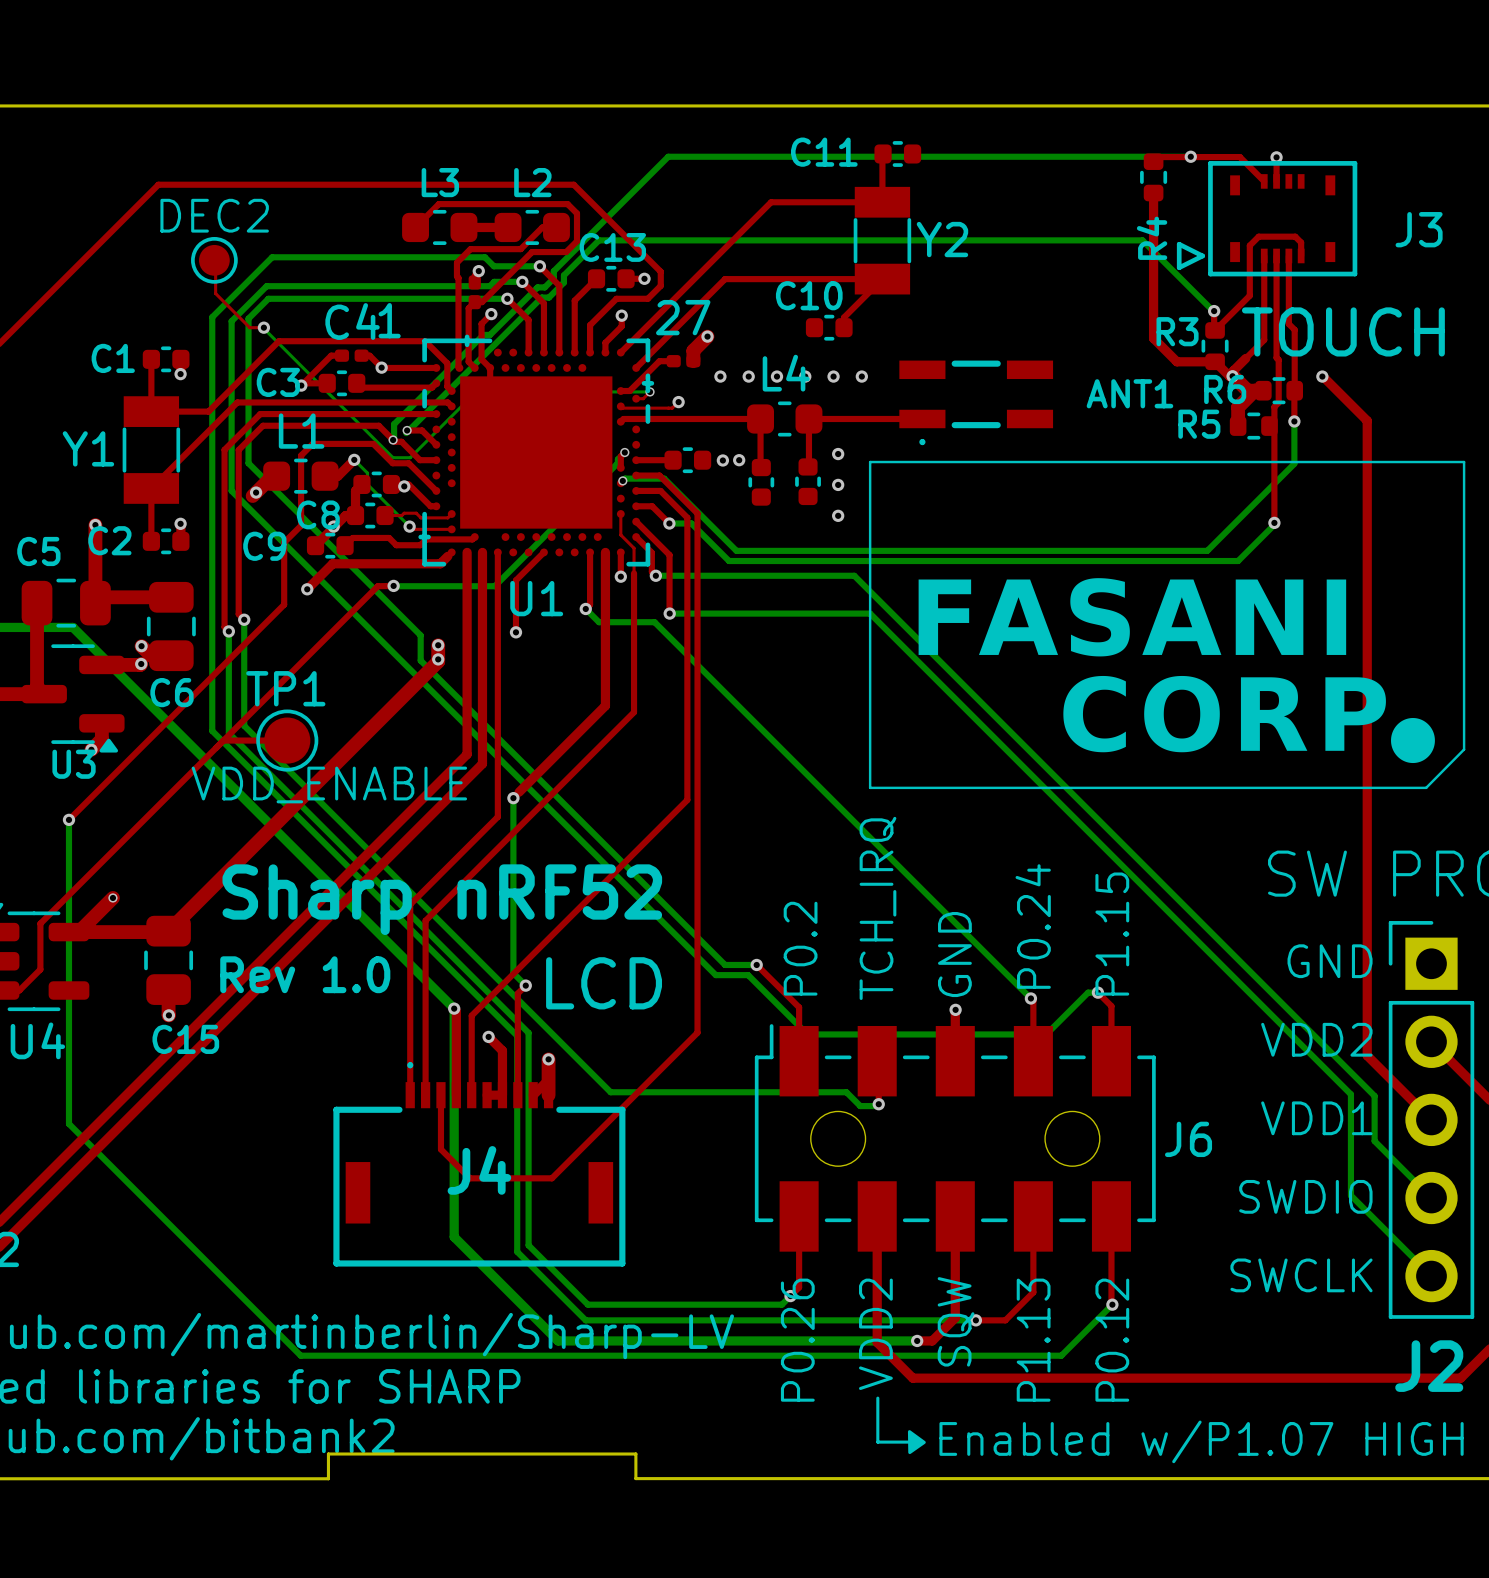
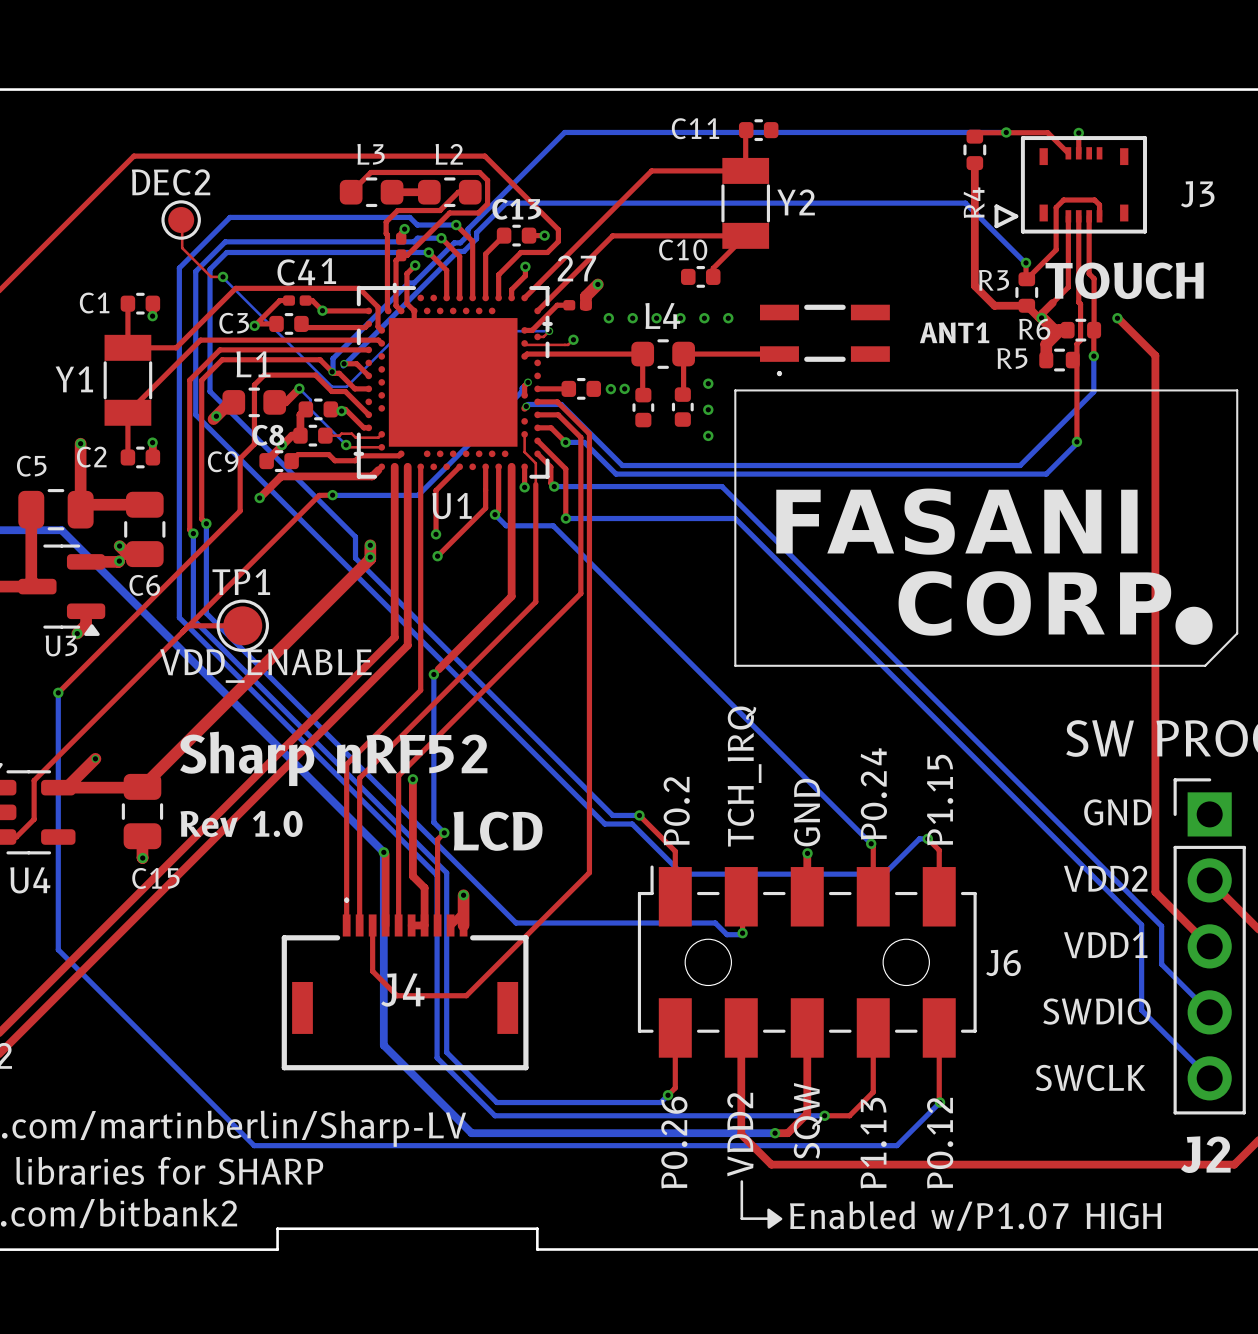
top track: none -> (485, 466) (485, 508) (437, 556)
via: none -> (437, 556)
top track: (687, 702) (687, 800) (471, 1015) -> (580, 593) (398, 775) (398, 858)
top track: none -> (412, 779) (412, 876)
via position: (488, 1036) -> (412, 779)

